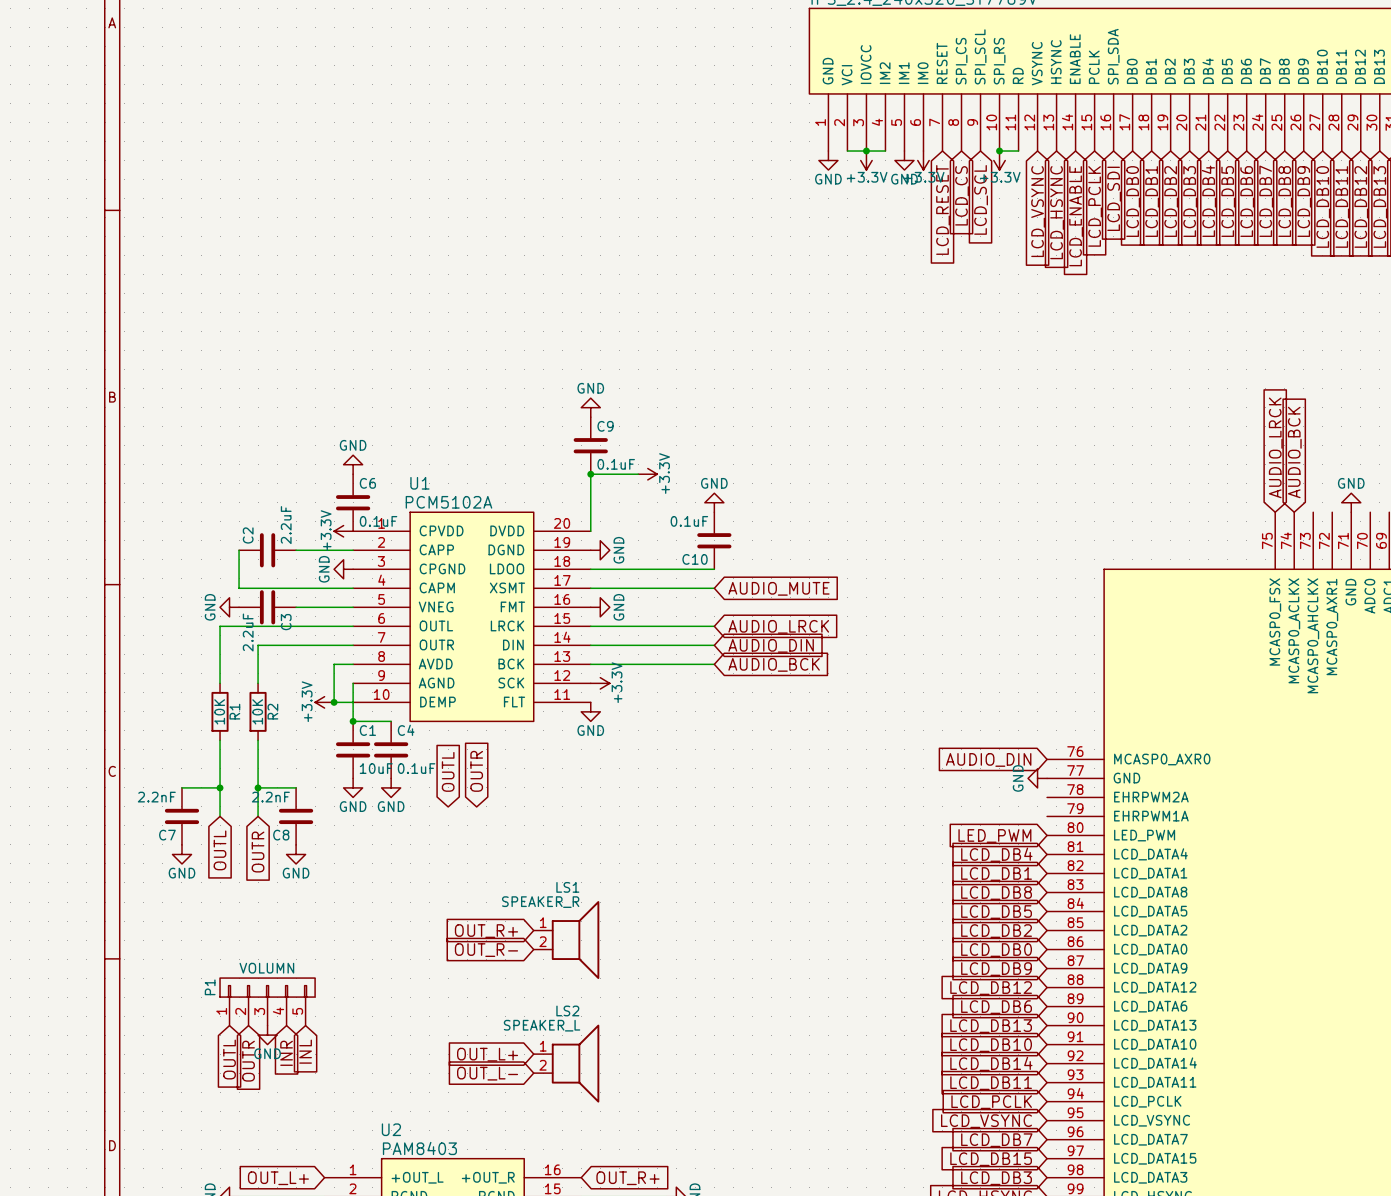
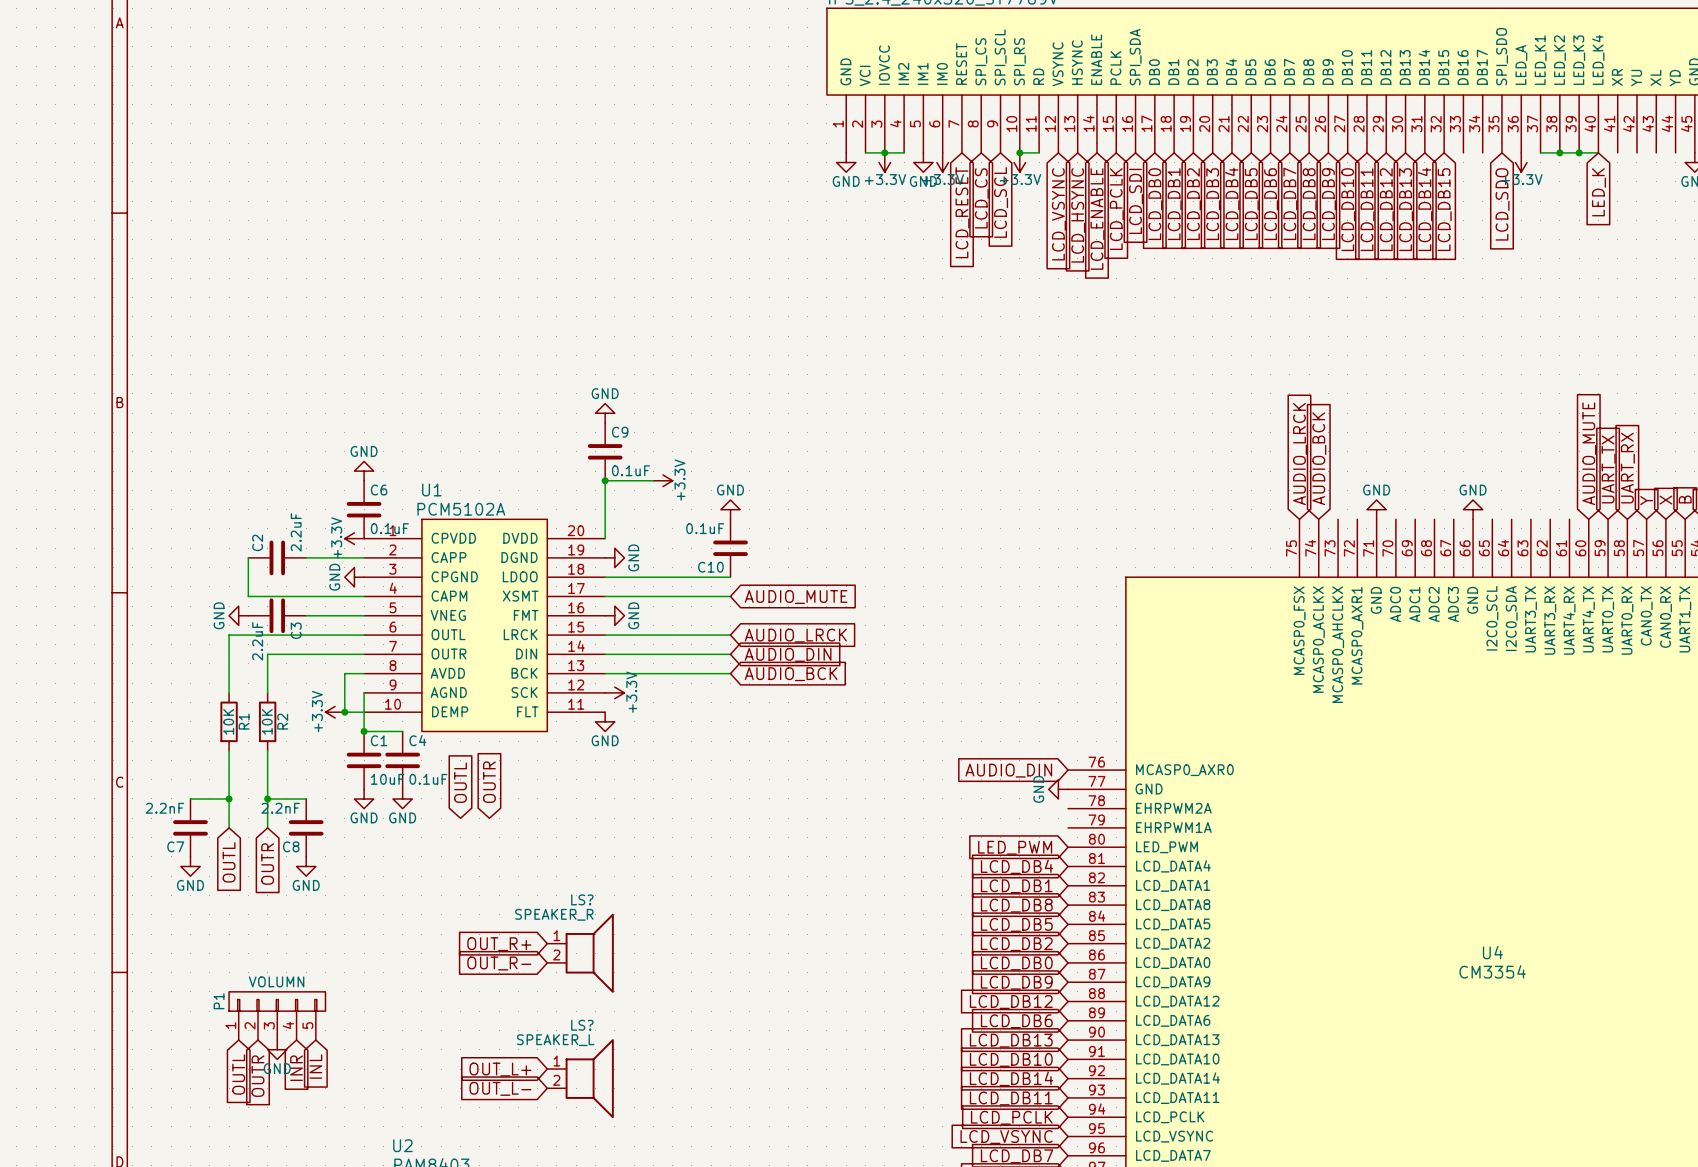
LS1 name: LS1 (567, 887) -> LS? (582, 899)
LS2 name: LS2 (567, 1010) -> LS? (582, 1025)

